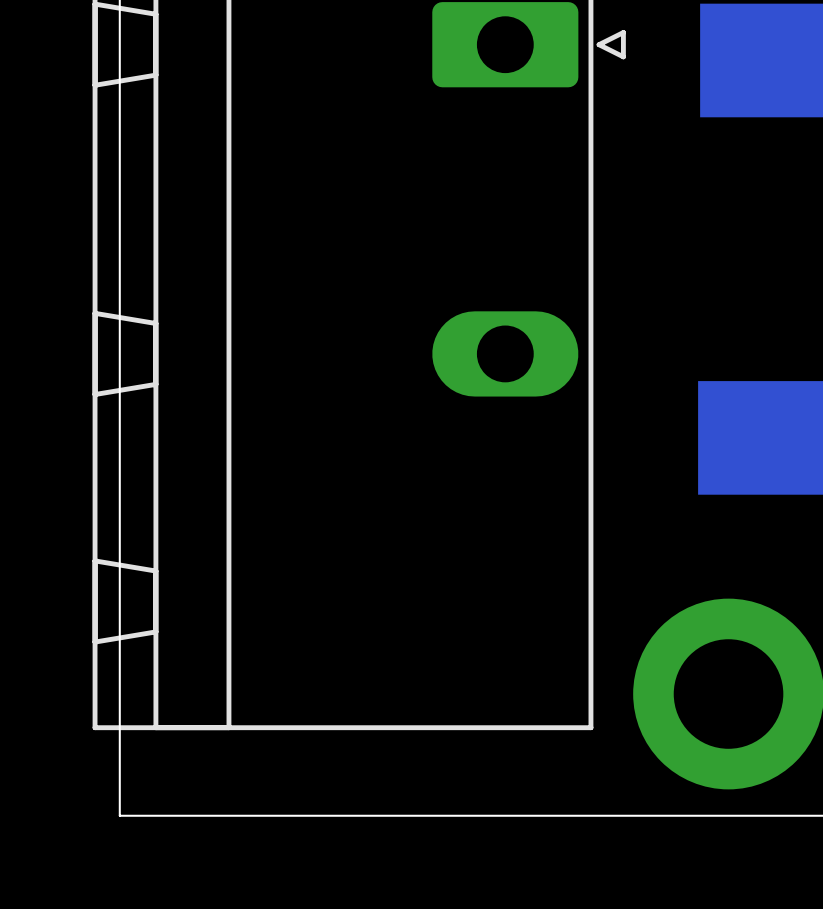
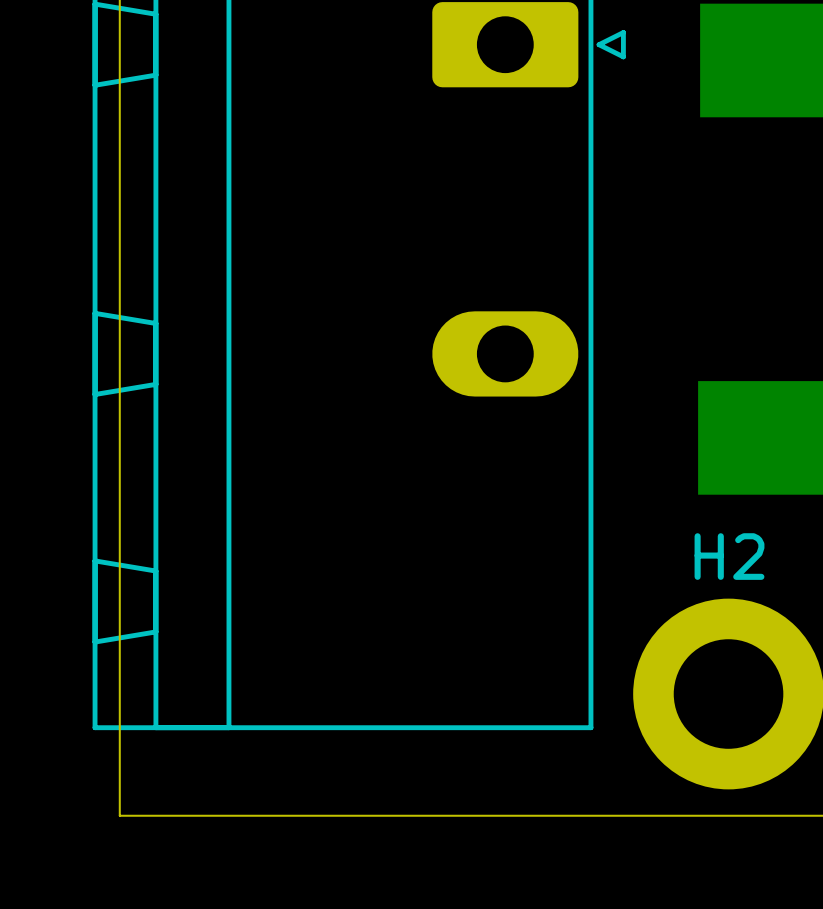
H2 name: none -> H2 (729, 556)

